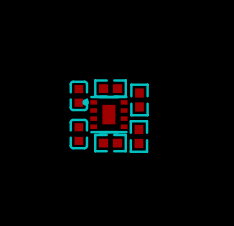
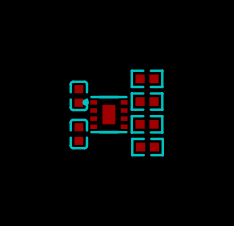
part: none -> (147, 78)
part: (110, 88) -> none
part rotation: 0° (139, 99) -> 90° clockwise (147, 101)
part: none -> (147, 124)
part: (138, 136) -> none
part: (110, 143) -> none
part: none -> (147, 147)

